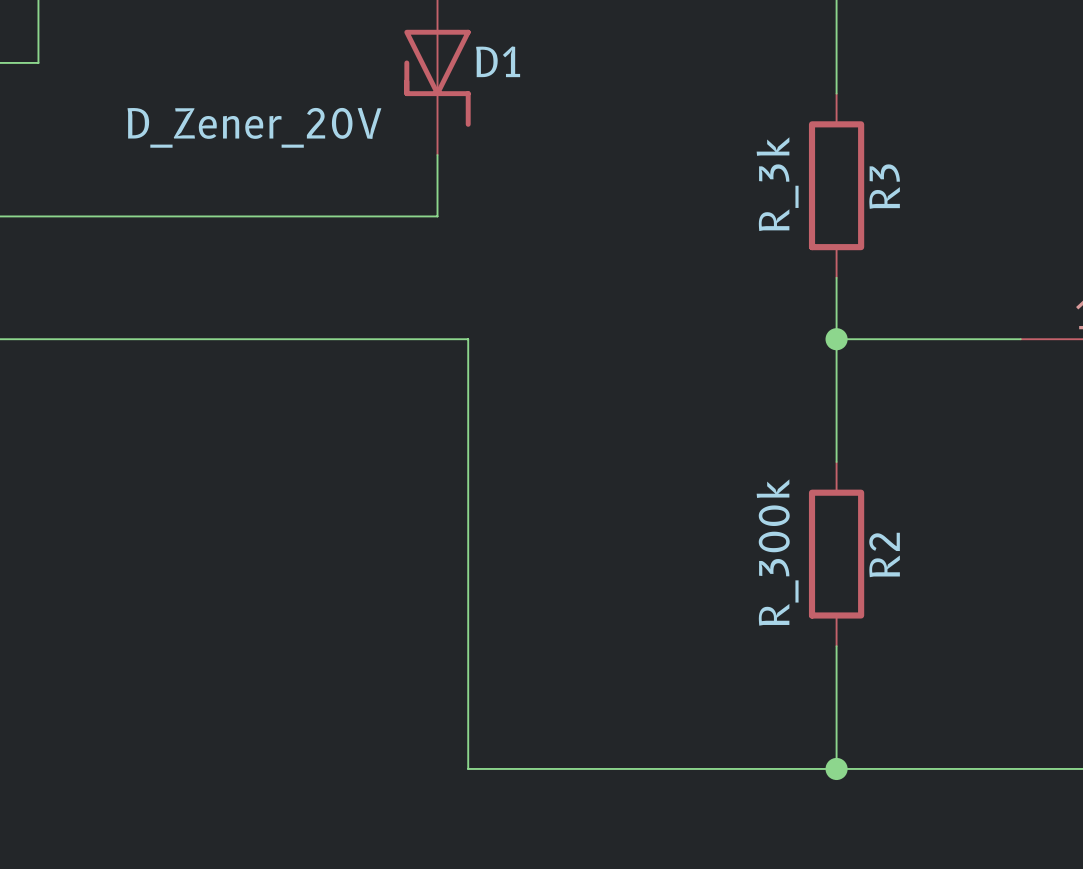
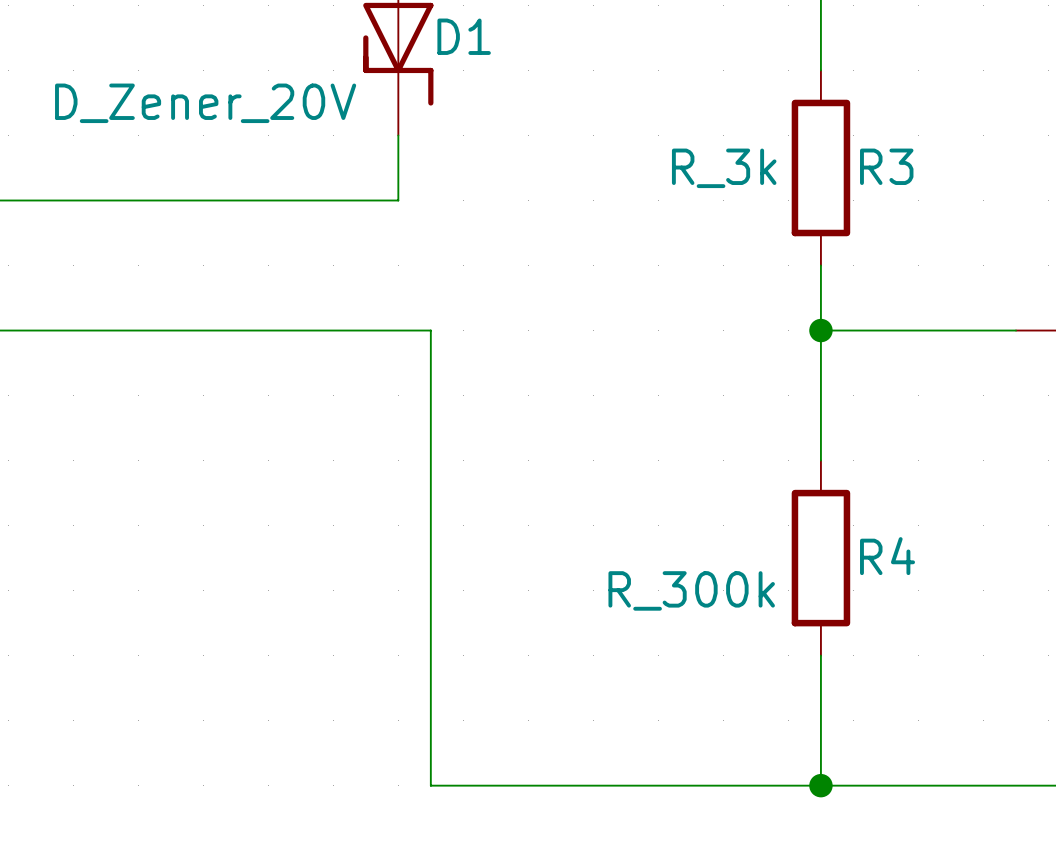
R3 value rotation: 0° (777, 184) -> 90° clockwise (724, 168)
R3 name rotation: 0° (884, 186) -> 90° clockwise (886, 166)
R2 value rotation: 0° (777, 552) -> 90° clockwise (691, 590)
R2 name: R2 (884, 554) -> R4 (887, 556)

